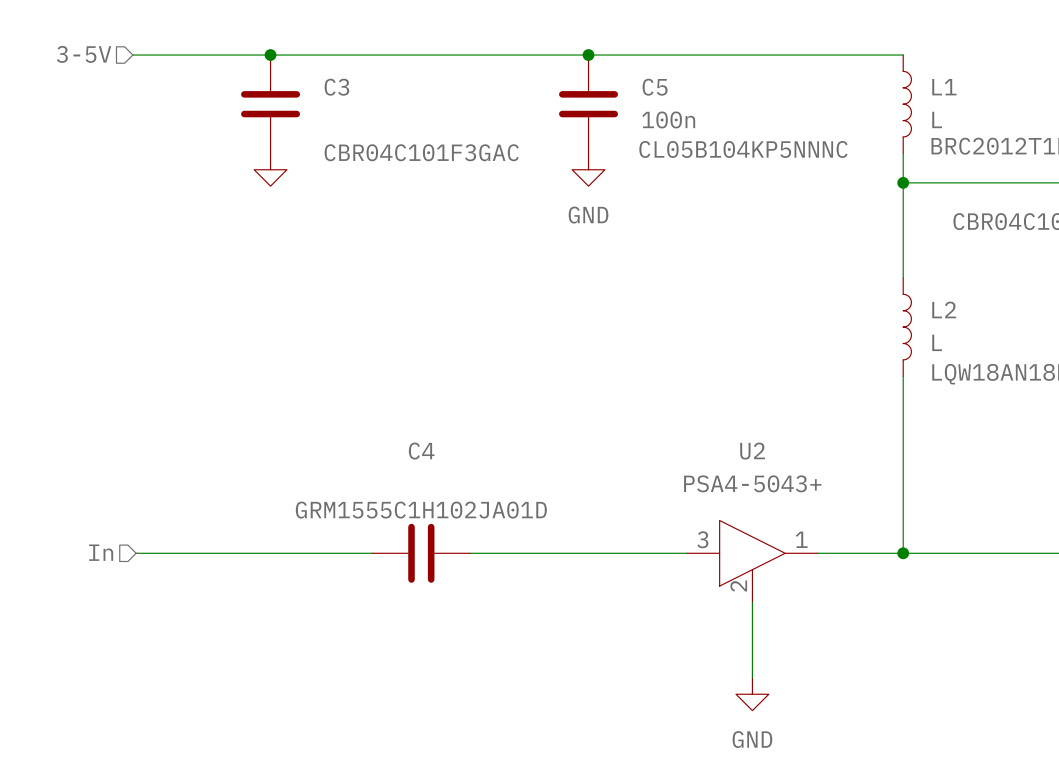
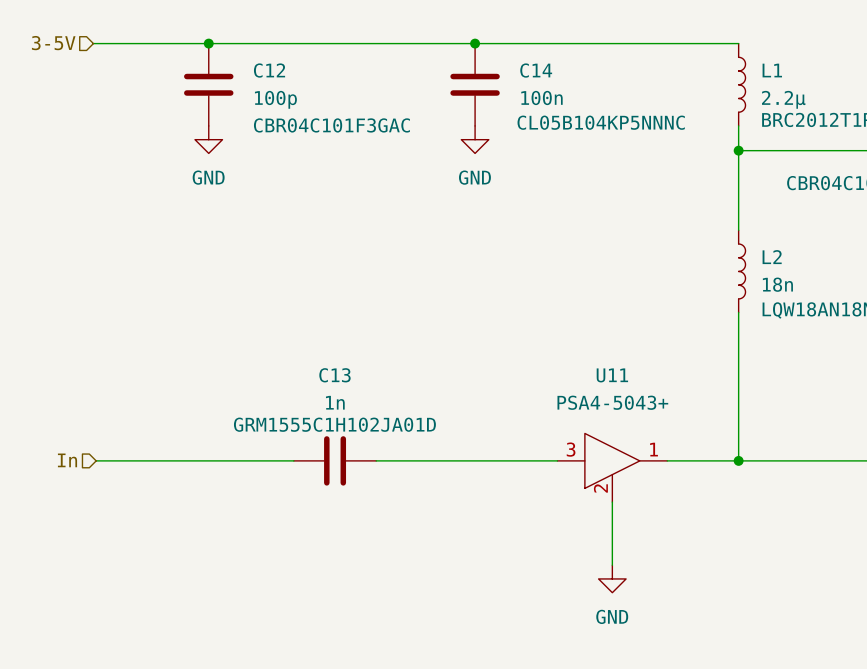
C3 name: C3 (336, 87) -> C12 (269, 70)
C5 name: C5 (655, 87) -> C14 (536, 70)
L1 value: L (937, 119) -> 2.2µ (783, 99)
C3 value: none -> 100p (275, 99)
power symbol text: none -> GND (208, 177)
L2 value: L (937, 342) -> 18n (777, 284)
C4 name: C4 (421, 451) -> C13 (334, 375)
U2 name: U2 (752, 451) -> U11 (612, 375)
C4 value: none -> 1n (335, 402)

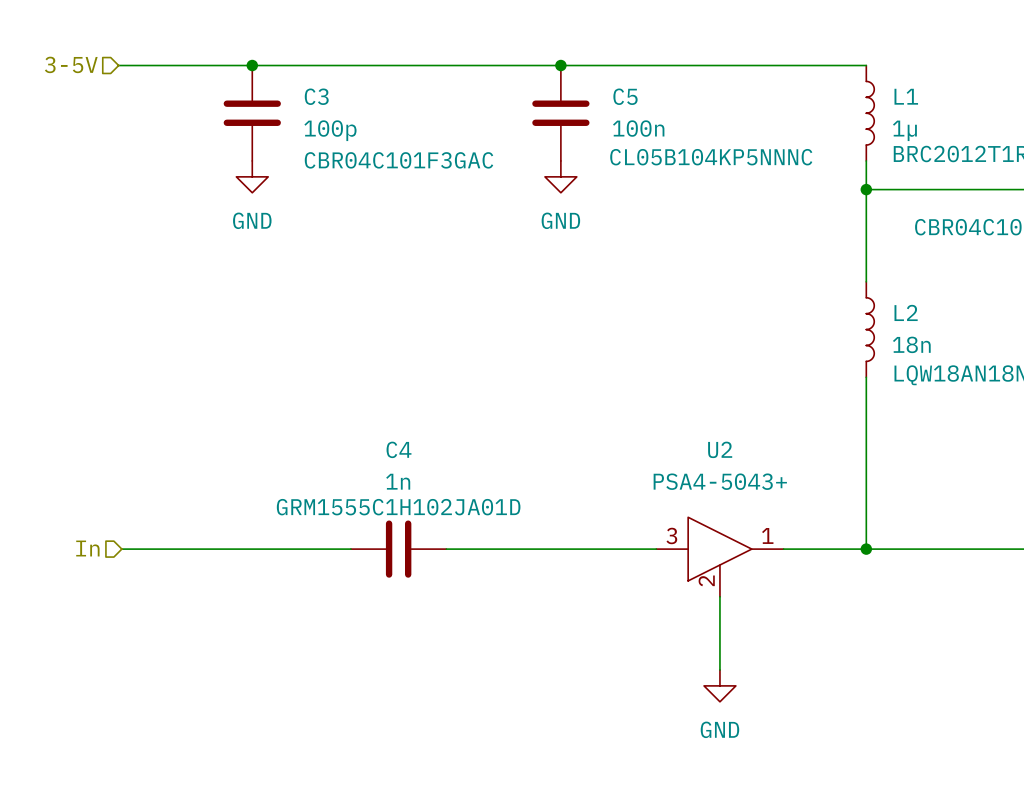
C12 name: C12 (269, 70) -> C3 (316, 96)
C14 name: C14 (536, 70) -> C5 (625, 96)
L1 value: 2.2µ (783, 99) -> 1µ (904, 130)
C13 name: C13 (334, 375) -> C4 (399, 449)
U11 name: U11 (612, 375) -> U2 (720, 449)

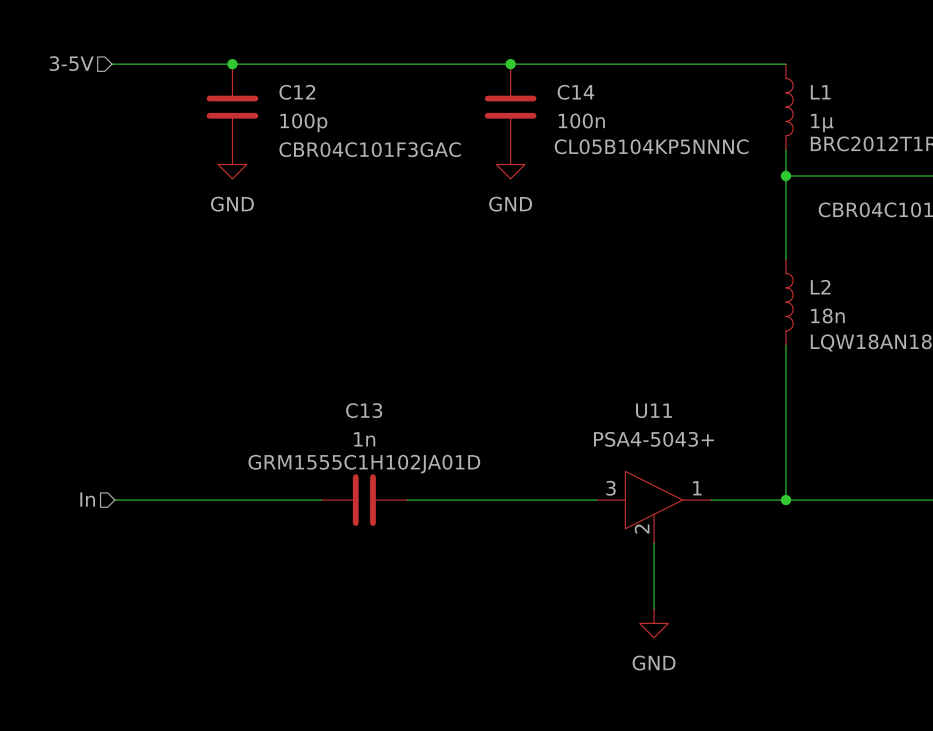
C3 name: C3 (316, 96) -> C12 (297, 92)
C5 name: C5 (625, 96) -> C14 (575, 92)
C4 name: C4 (399, 449) -> C13 (364, 410)
U2 name: U2 (720, 449) -> U11 (653, 410)

